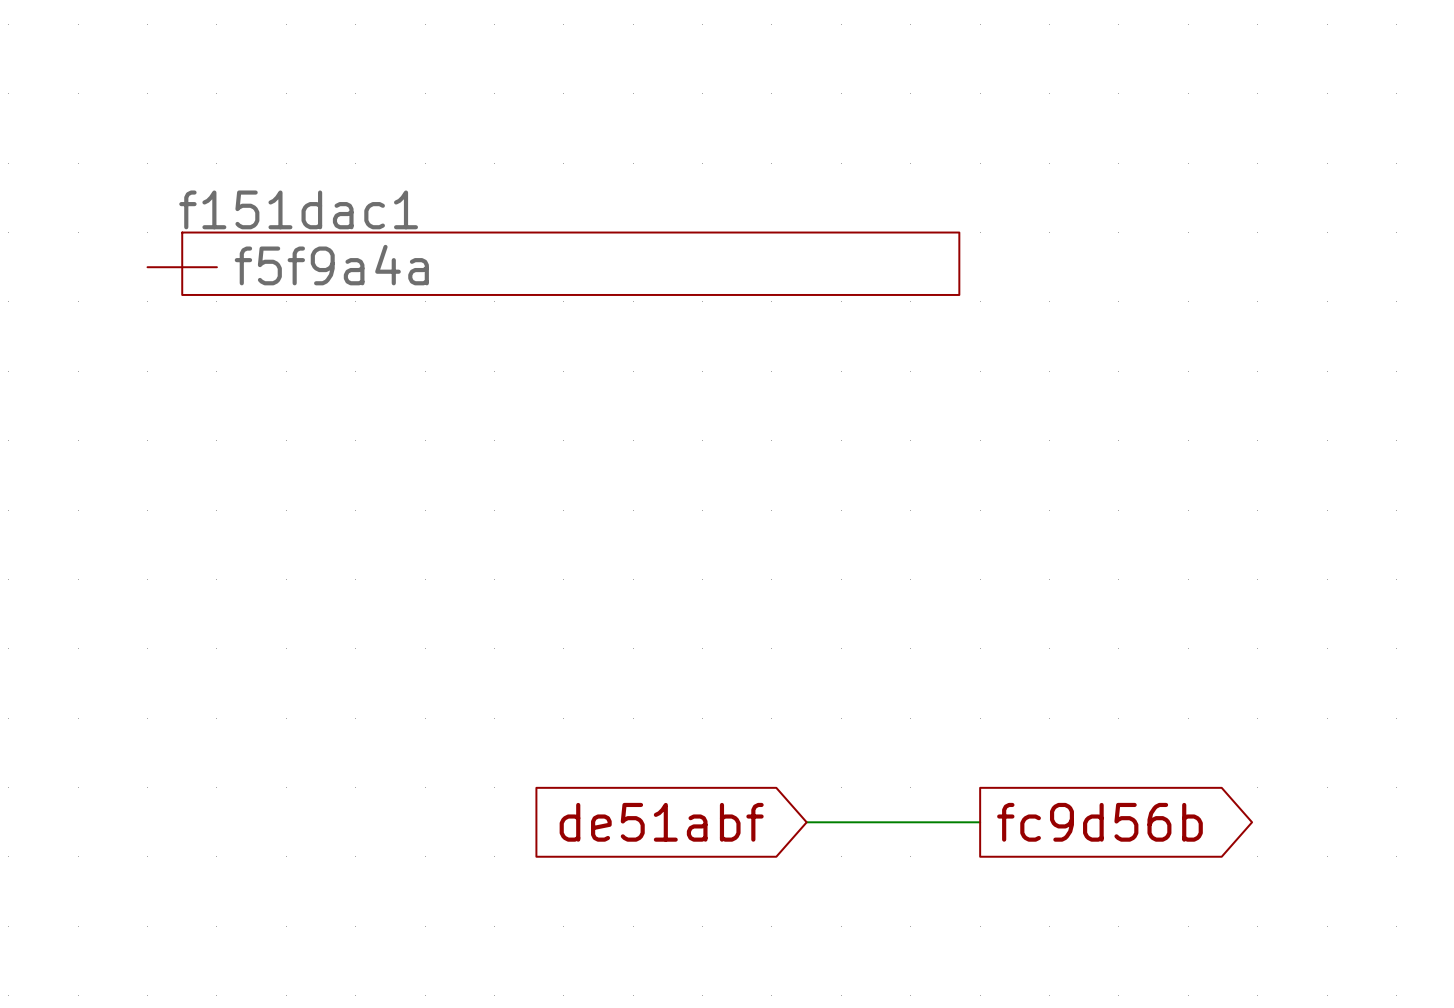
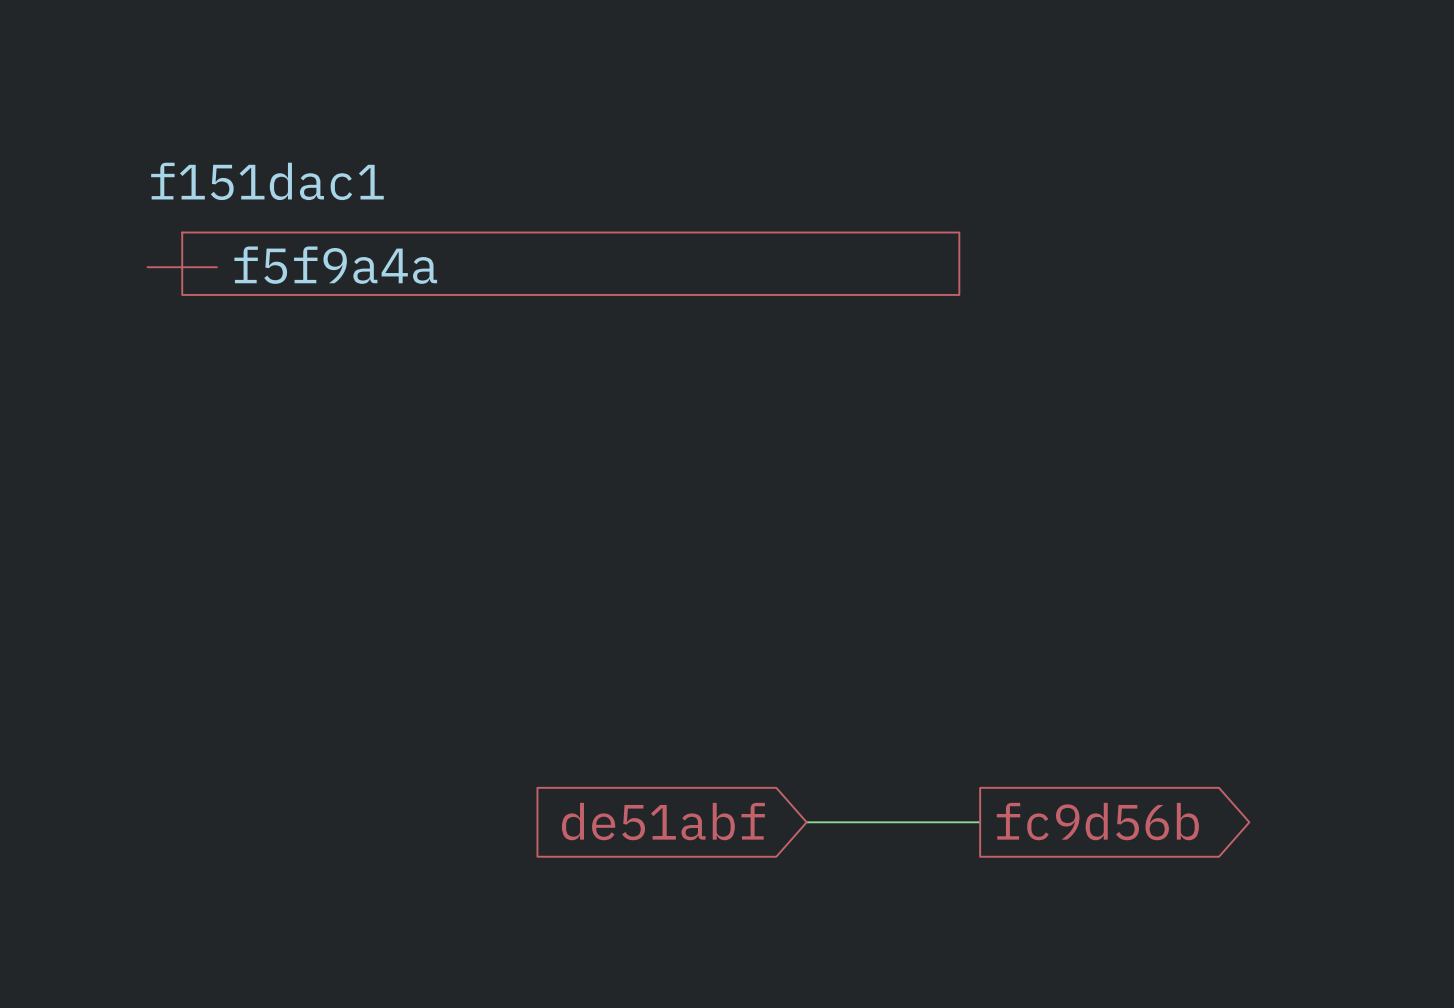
f151dac1 name position: f151dac1 (298, 209) -> f151dac1 (267, 181)

